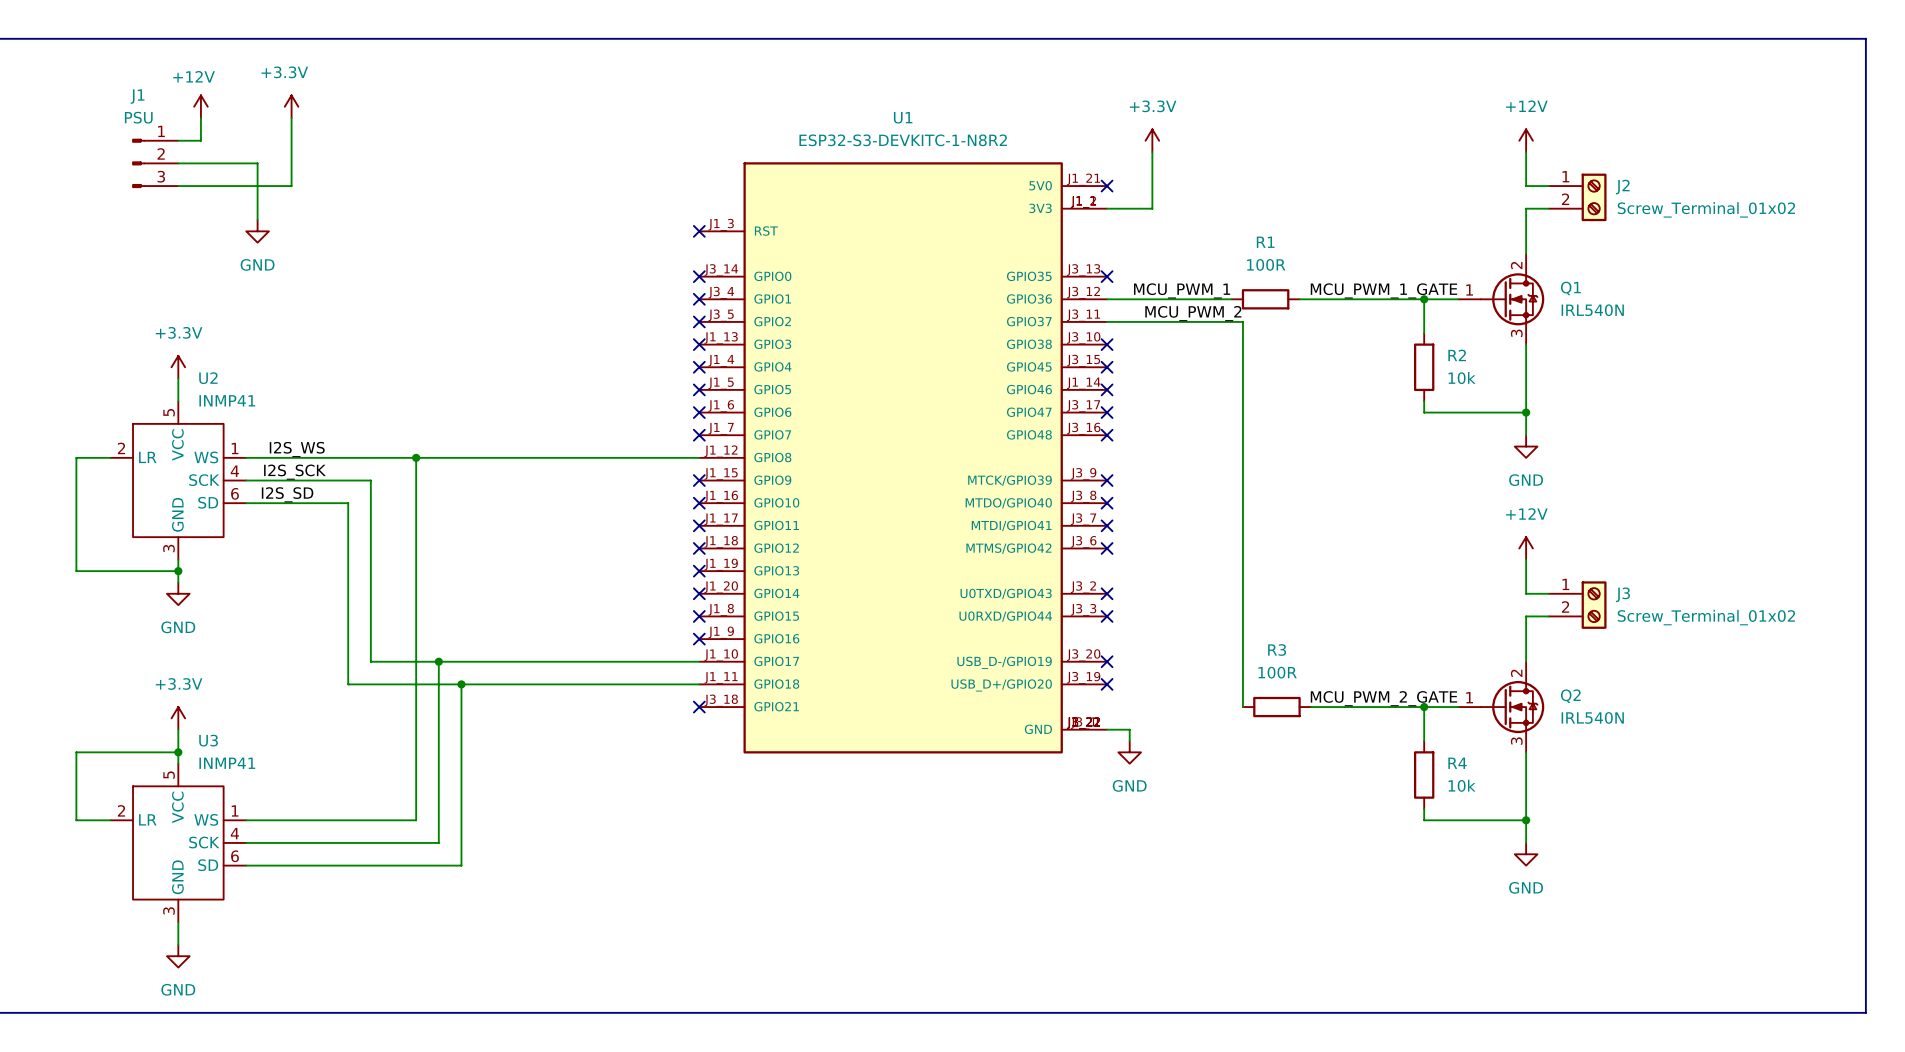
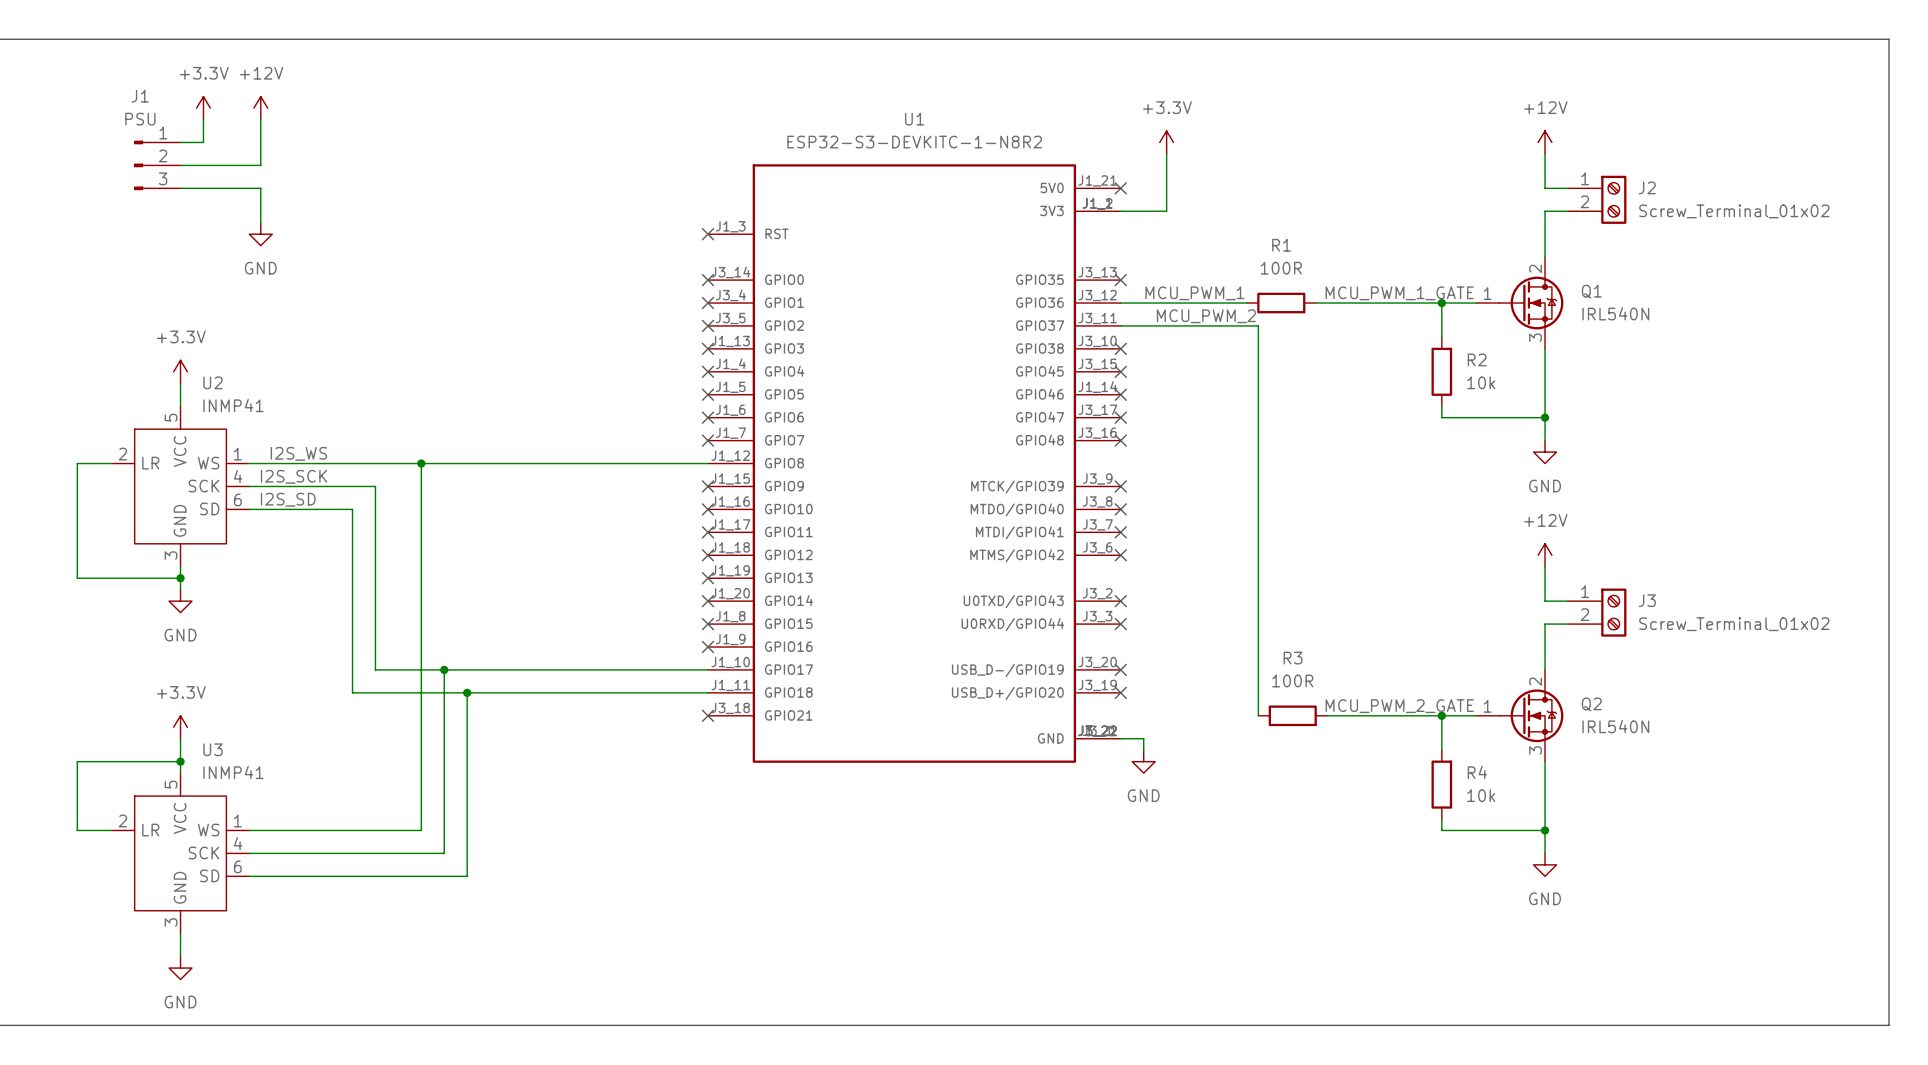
power symbol: +12V (200, 106) -> +3.3V (203, 108)
power symbol: none -> +12V (260, 108)
power symbol: +3.3V (291, 106) -> none
wire: (291, 118) (291, 186) (257, 186) (257, 163) -> (260, 119) (260, 165)

